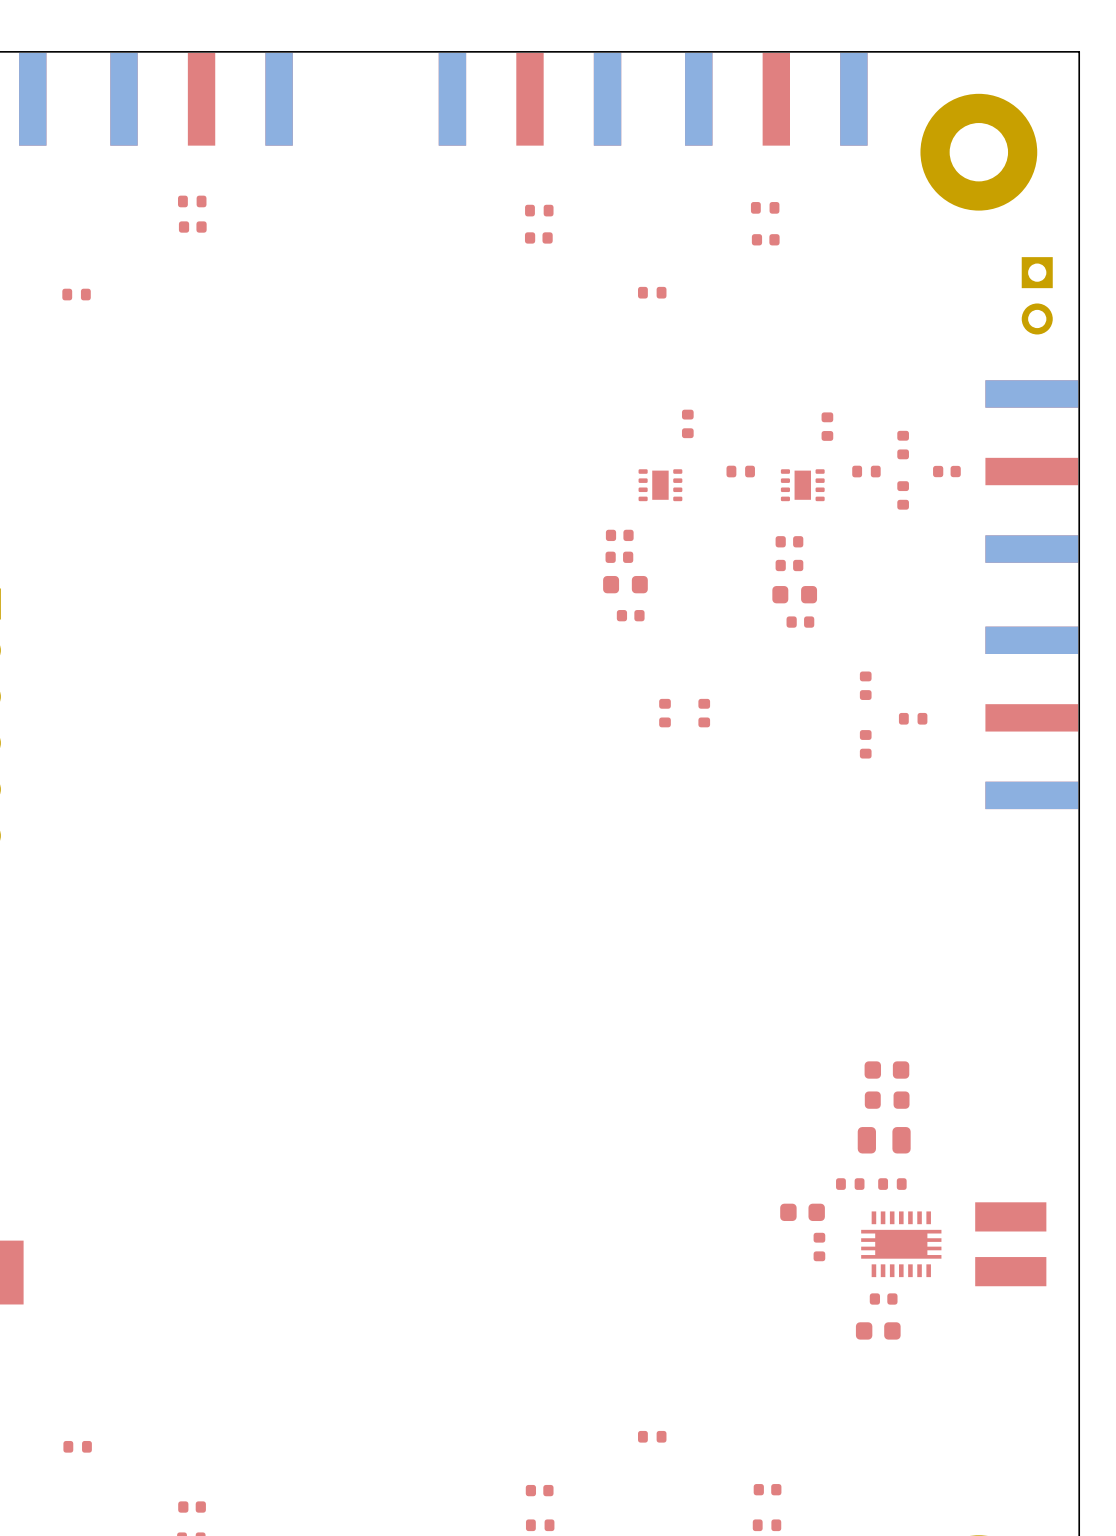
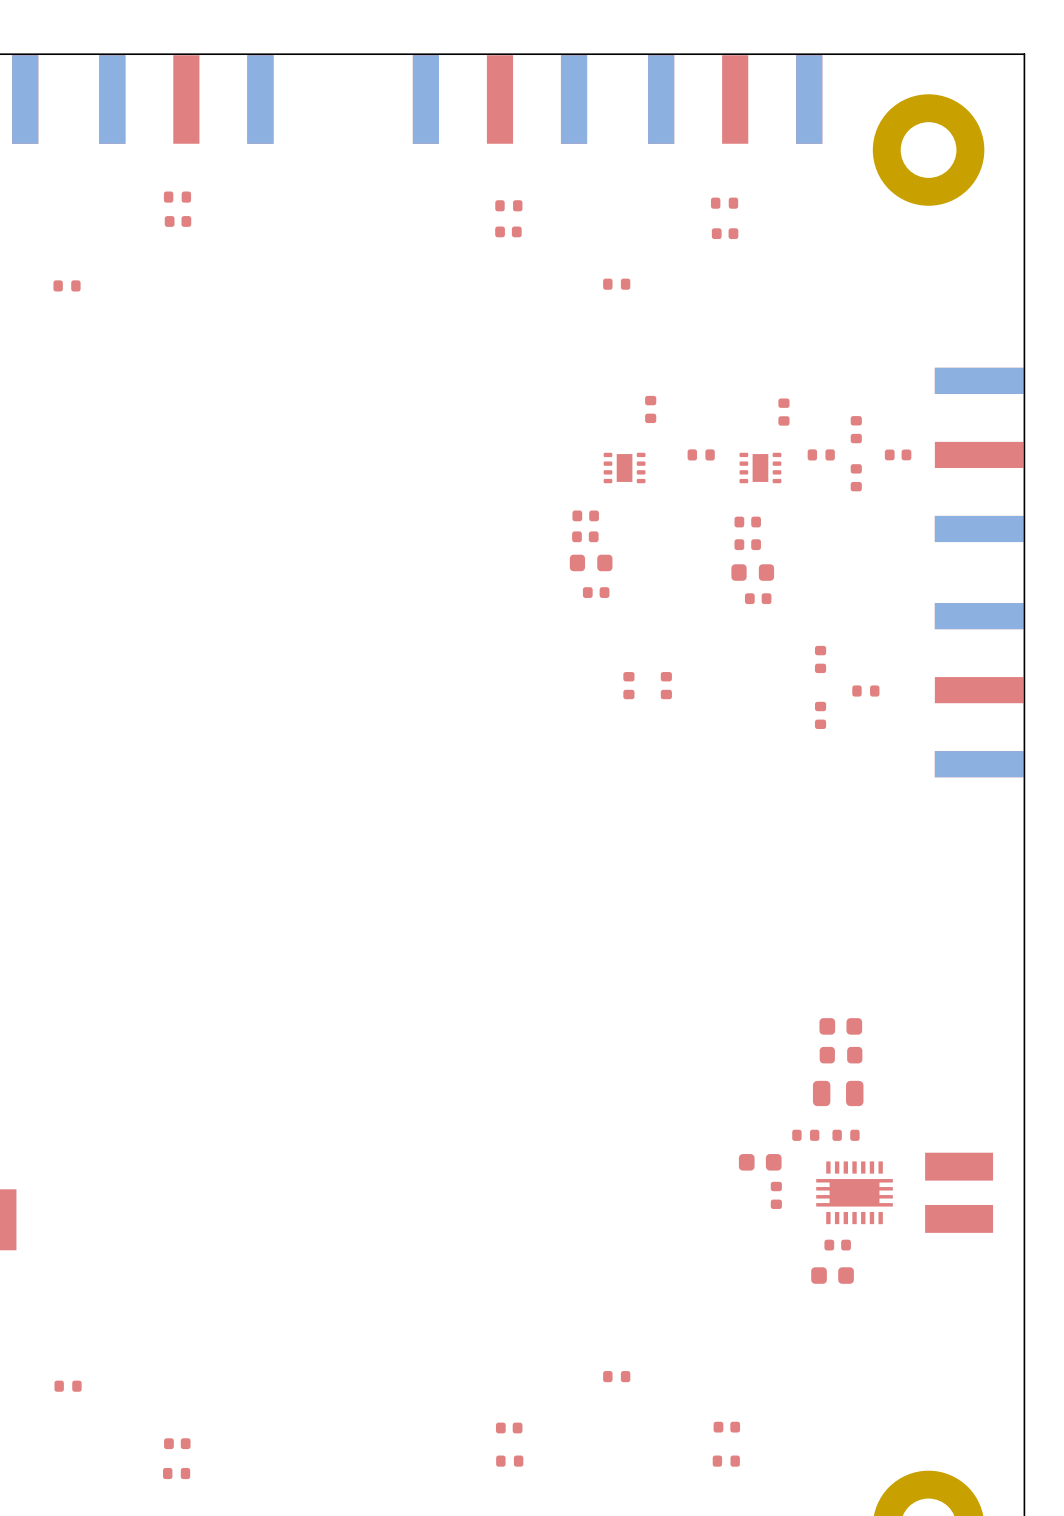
part: (1037, 295) -> none

